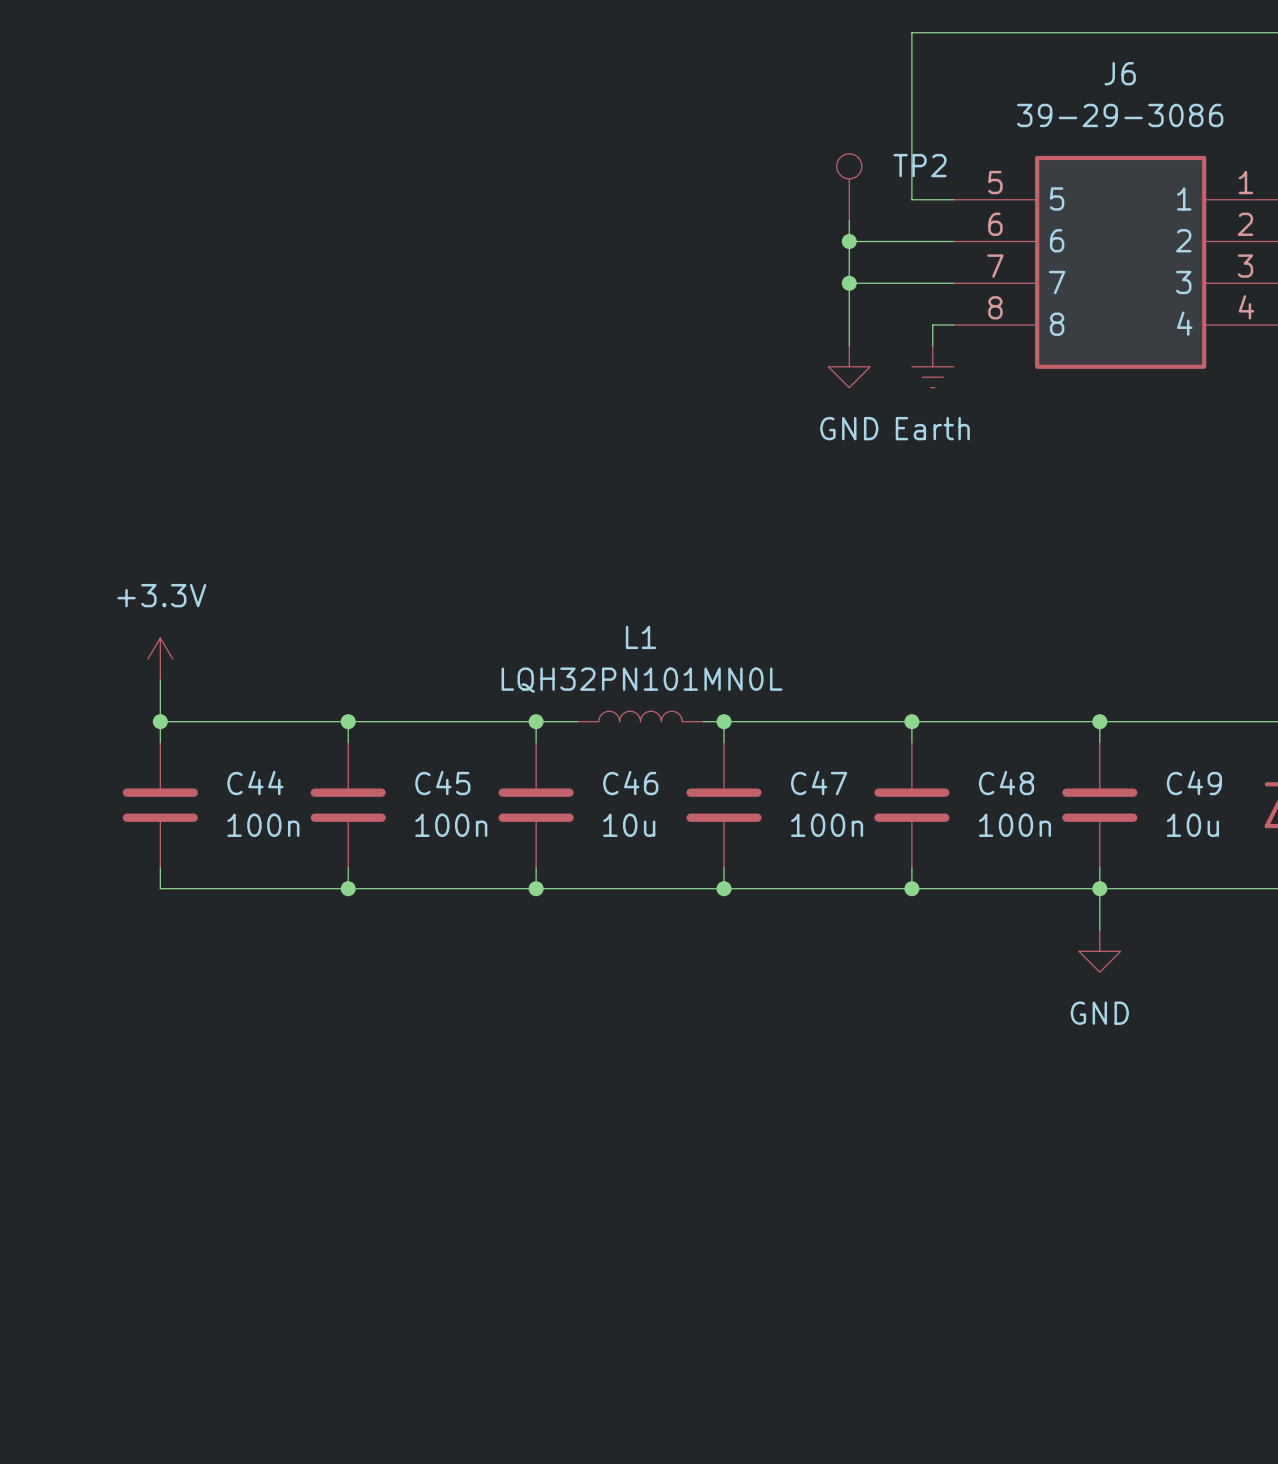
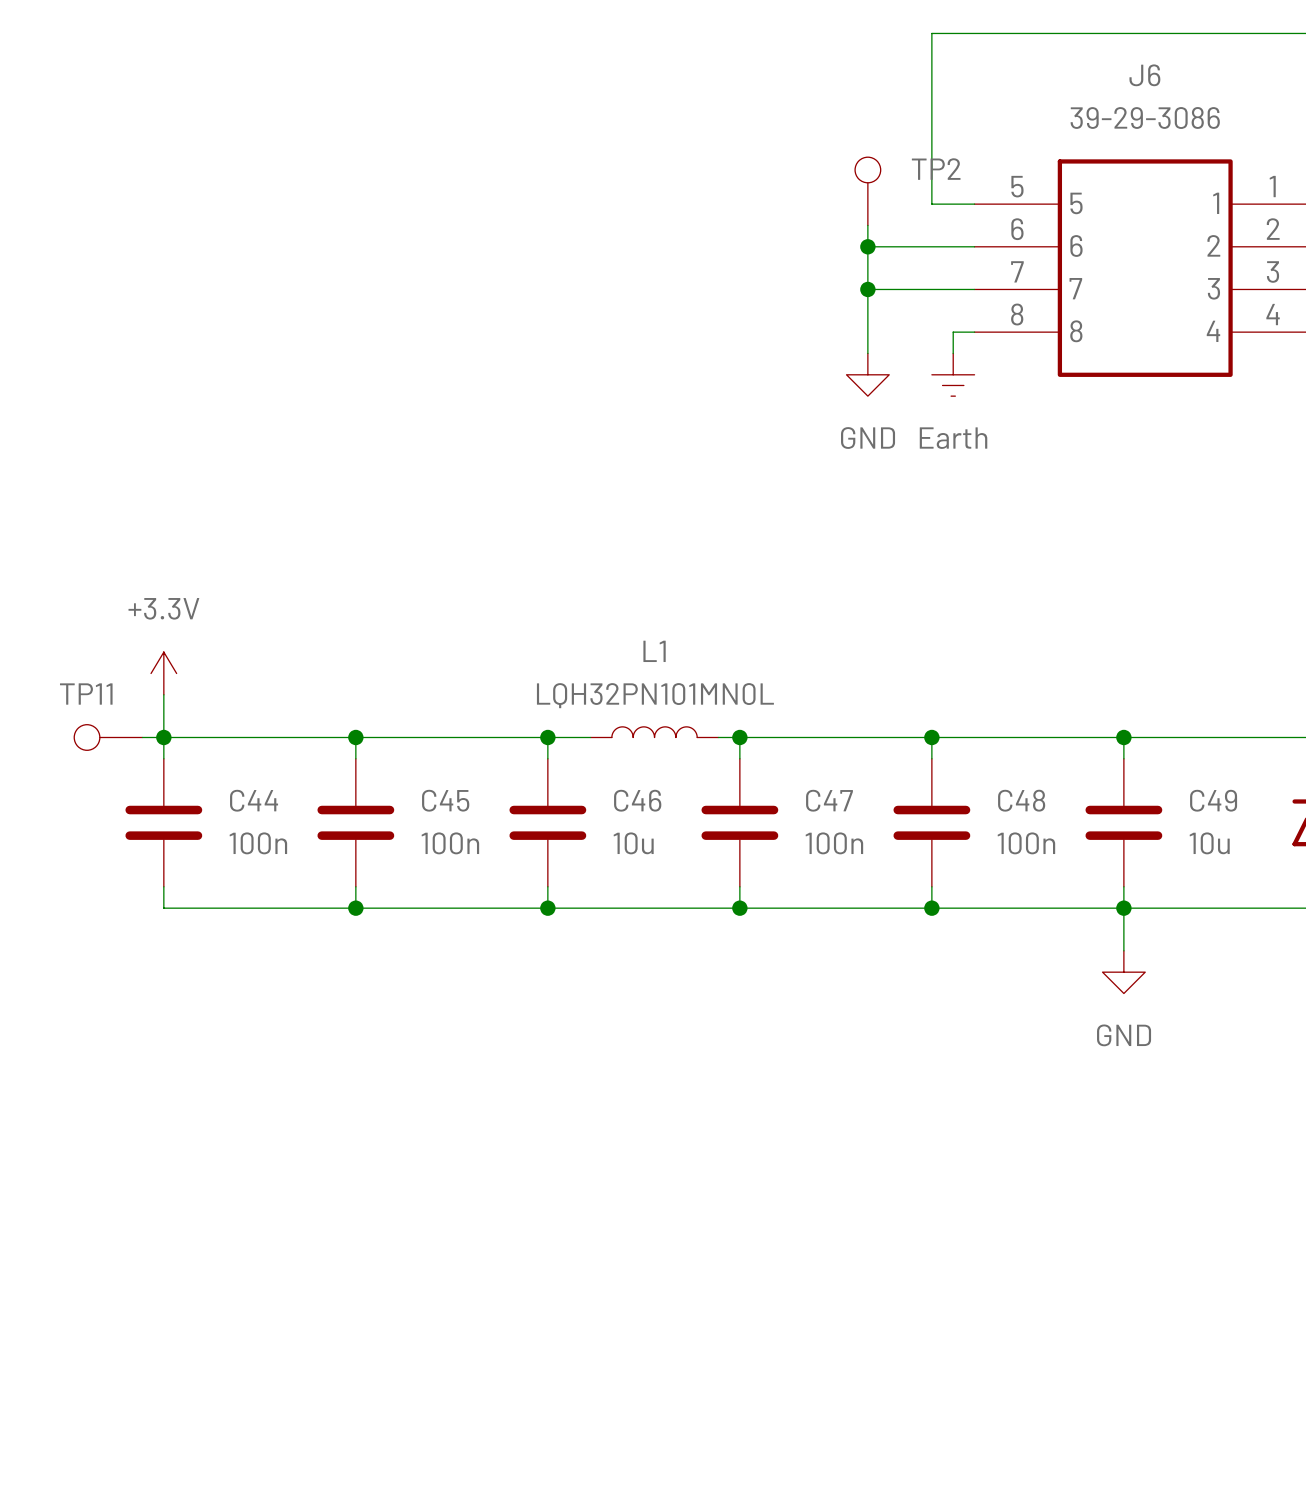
TP11: none -> (108, 737)
wire: none -> (142, 737) (163, 737)

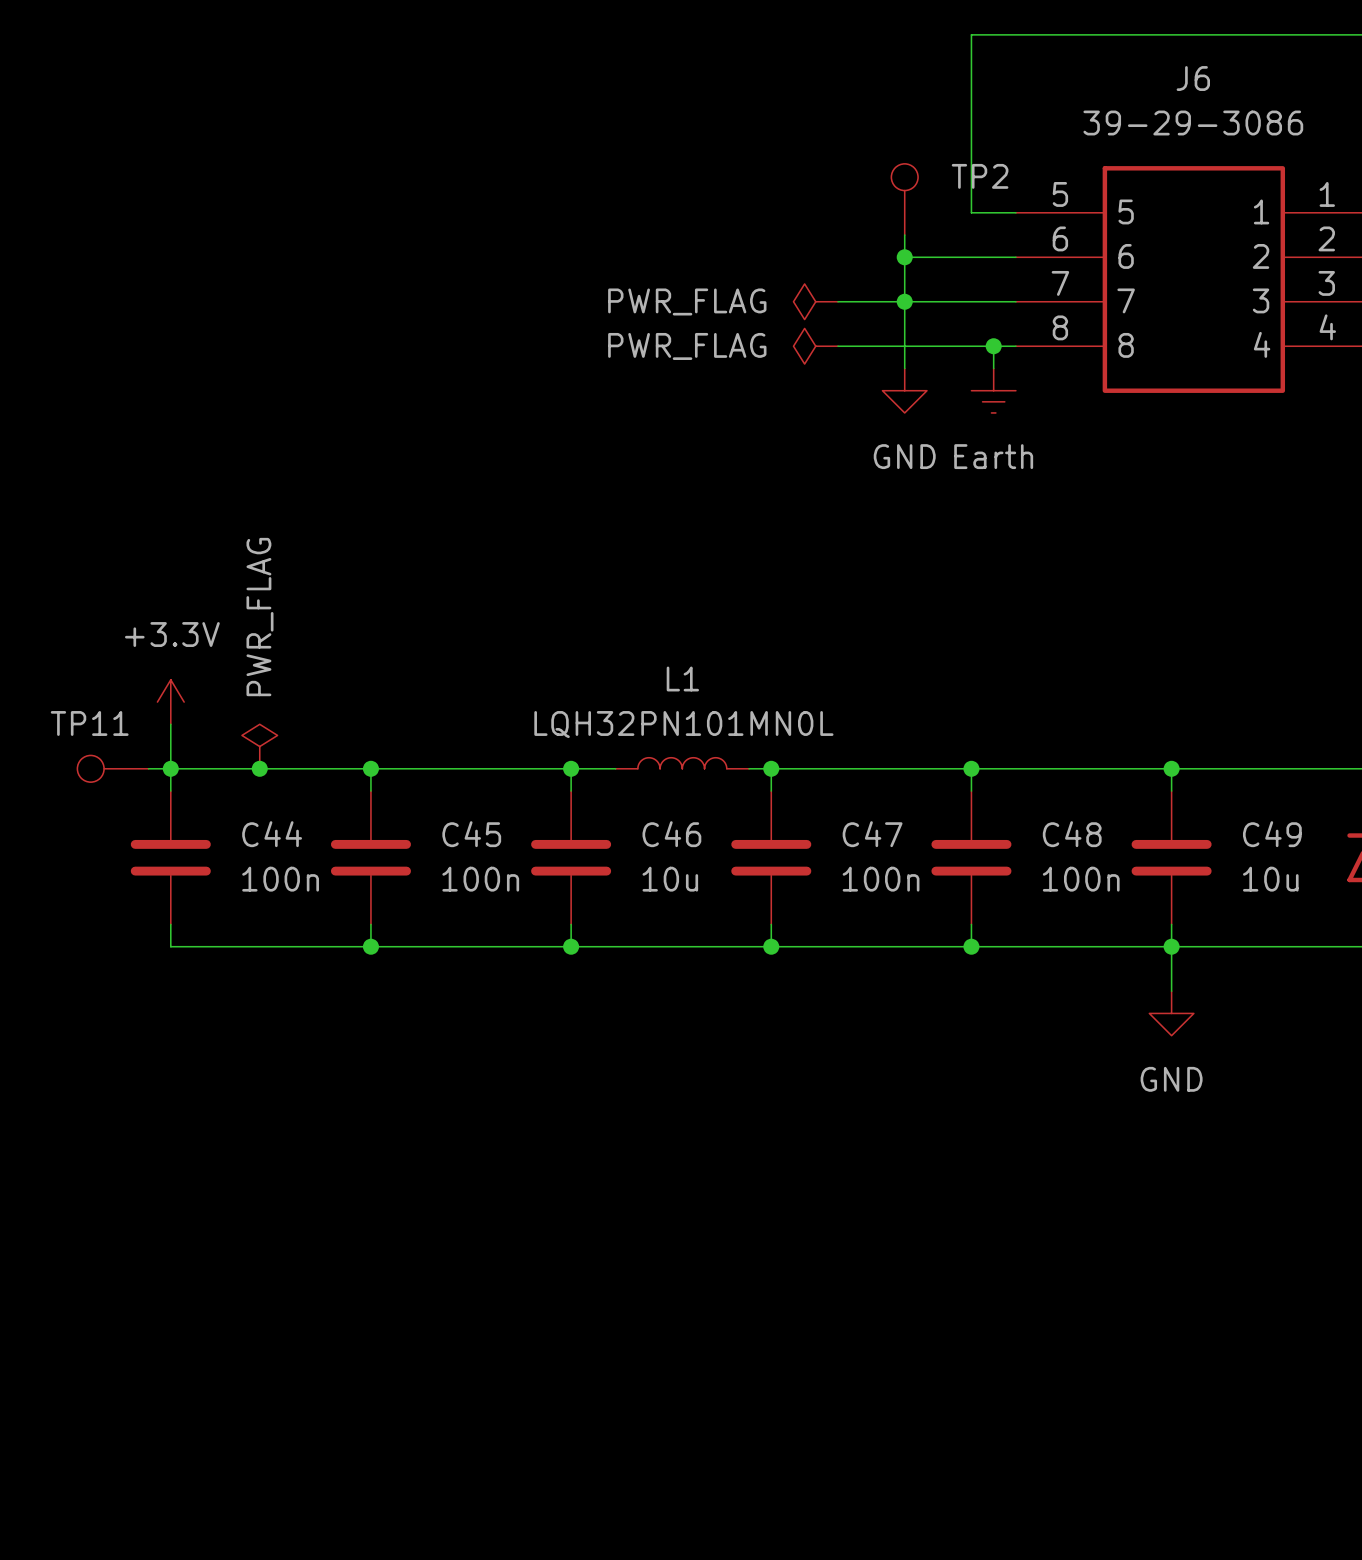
power symbol: none -> PWR_FLAG (815, 301)
wire: none -> (838, 301) (904, 301)
power symbol: none -> PWR_FLAG (815, 346)
wire: none -> (838, 346) (993, 346)
junction: none -> (993, 346)
power symbol: none -> PWR_FLAG (259, 746)
junction: none -> (259, 768)

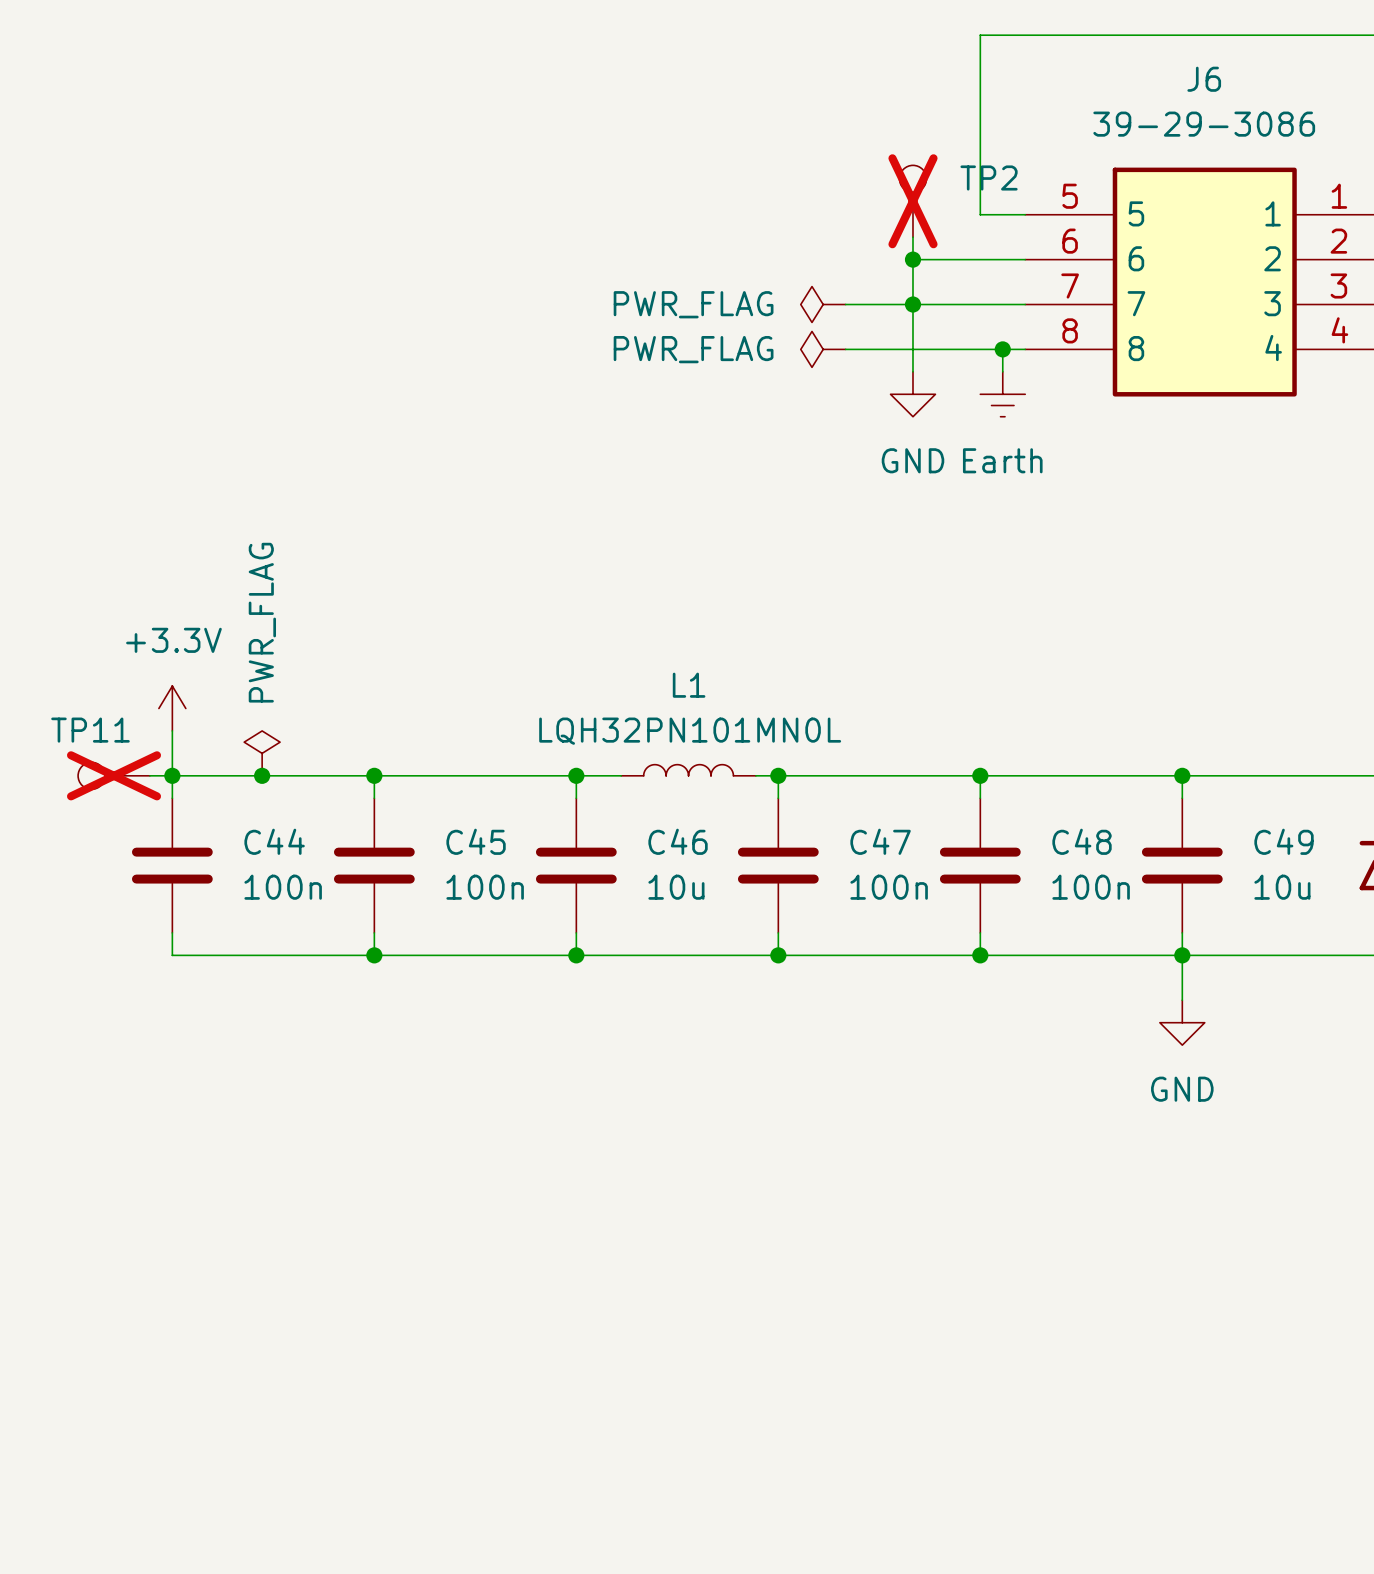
TP2 do-not-place cross: none -> (912, 201)
TP11 do-not-place cross: none -> (114, 775)

